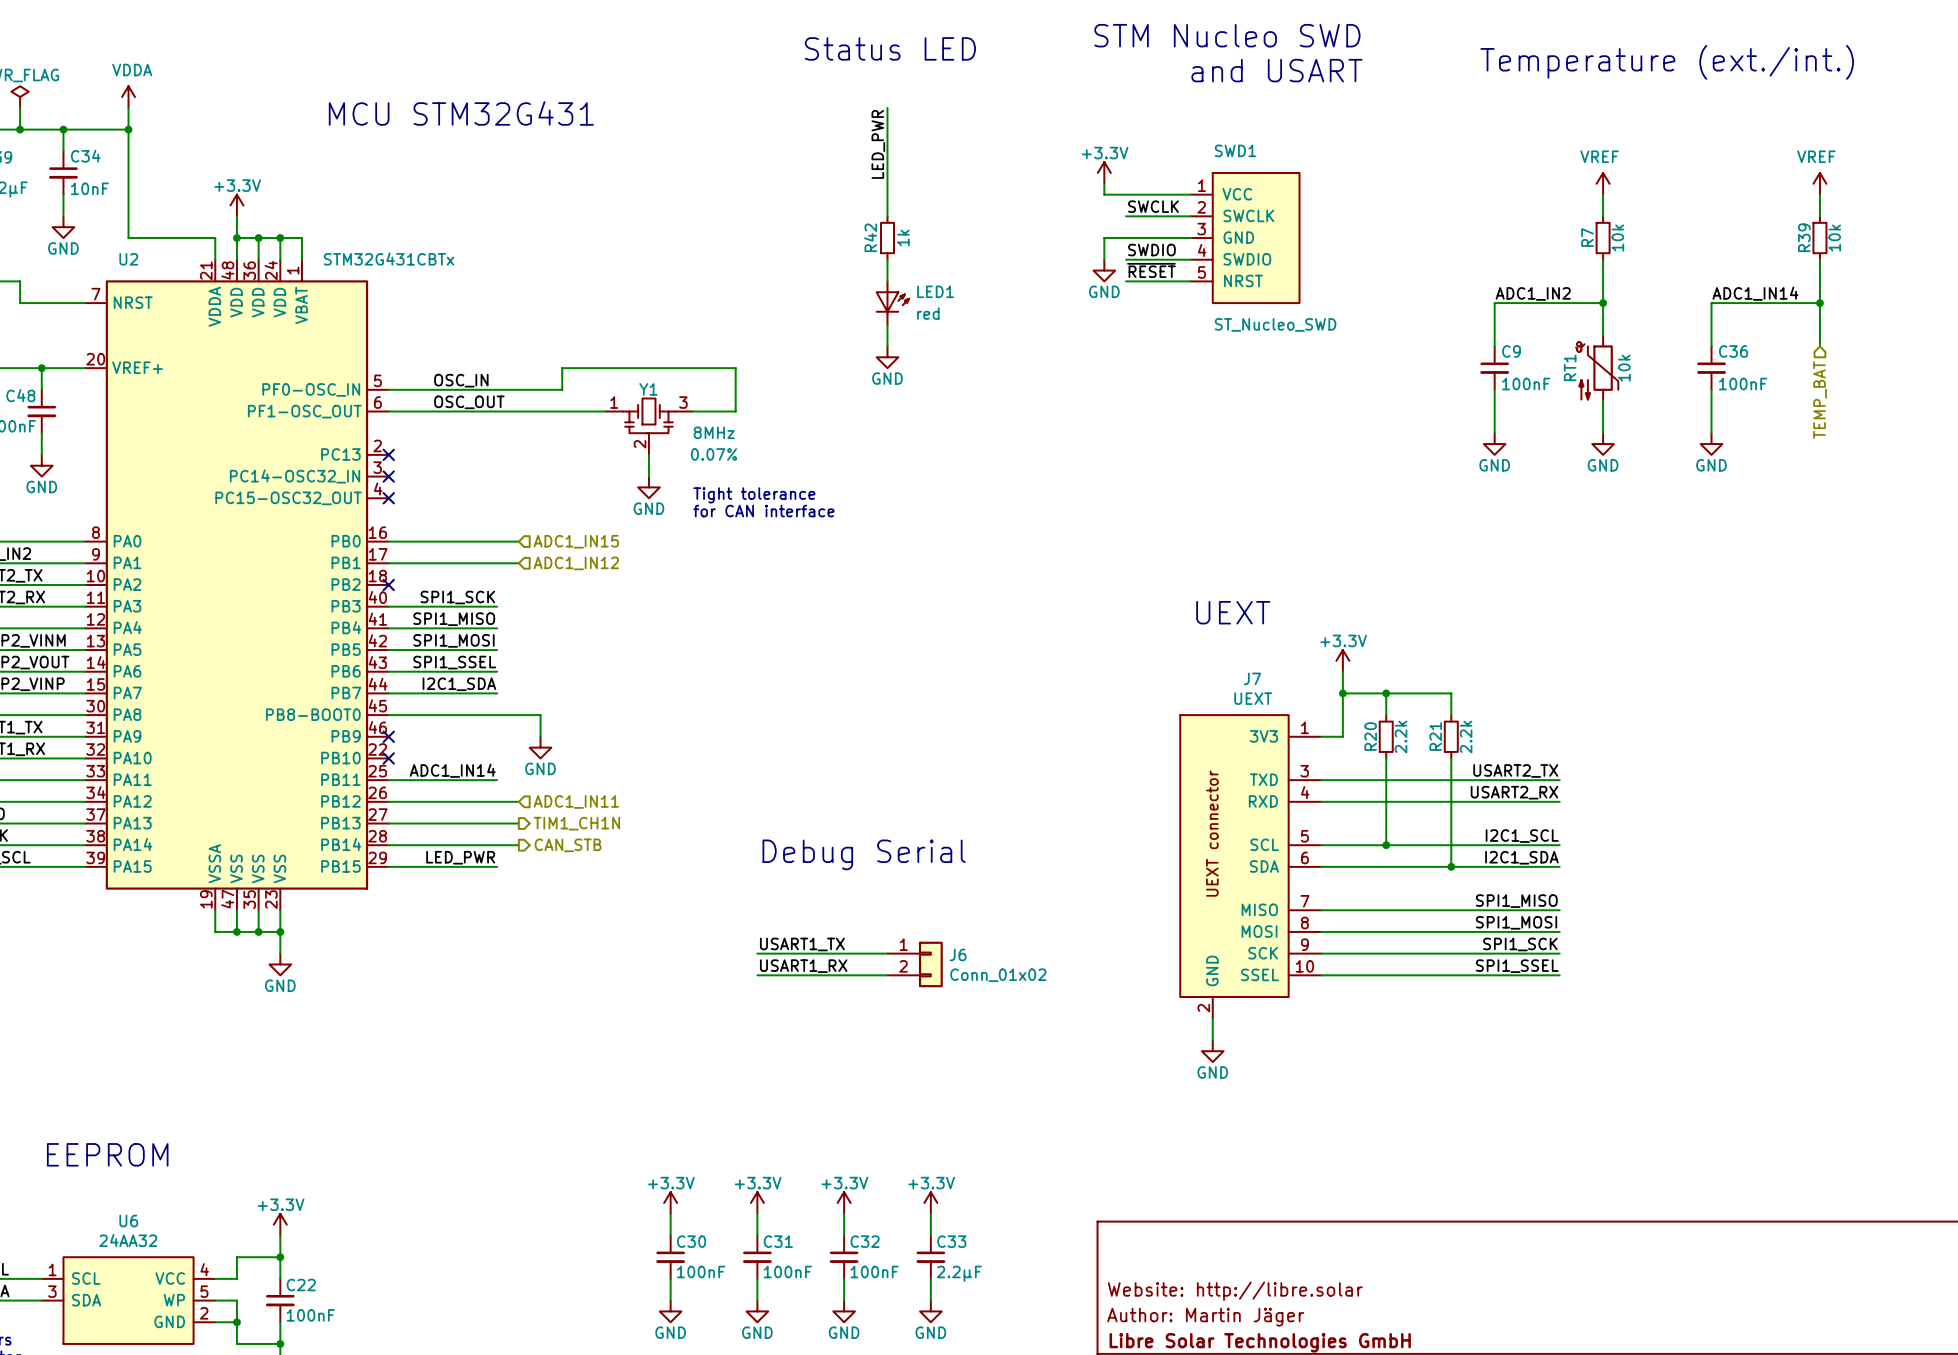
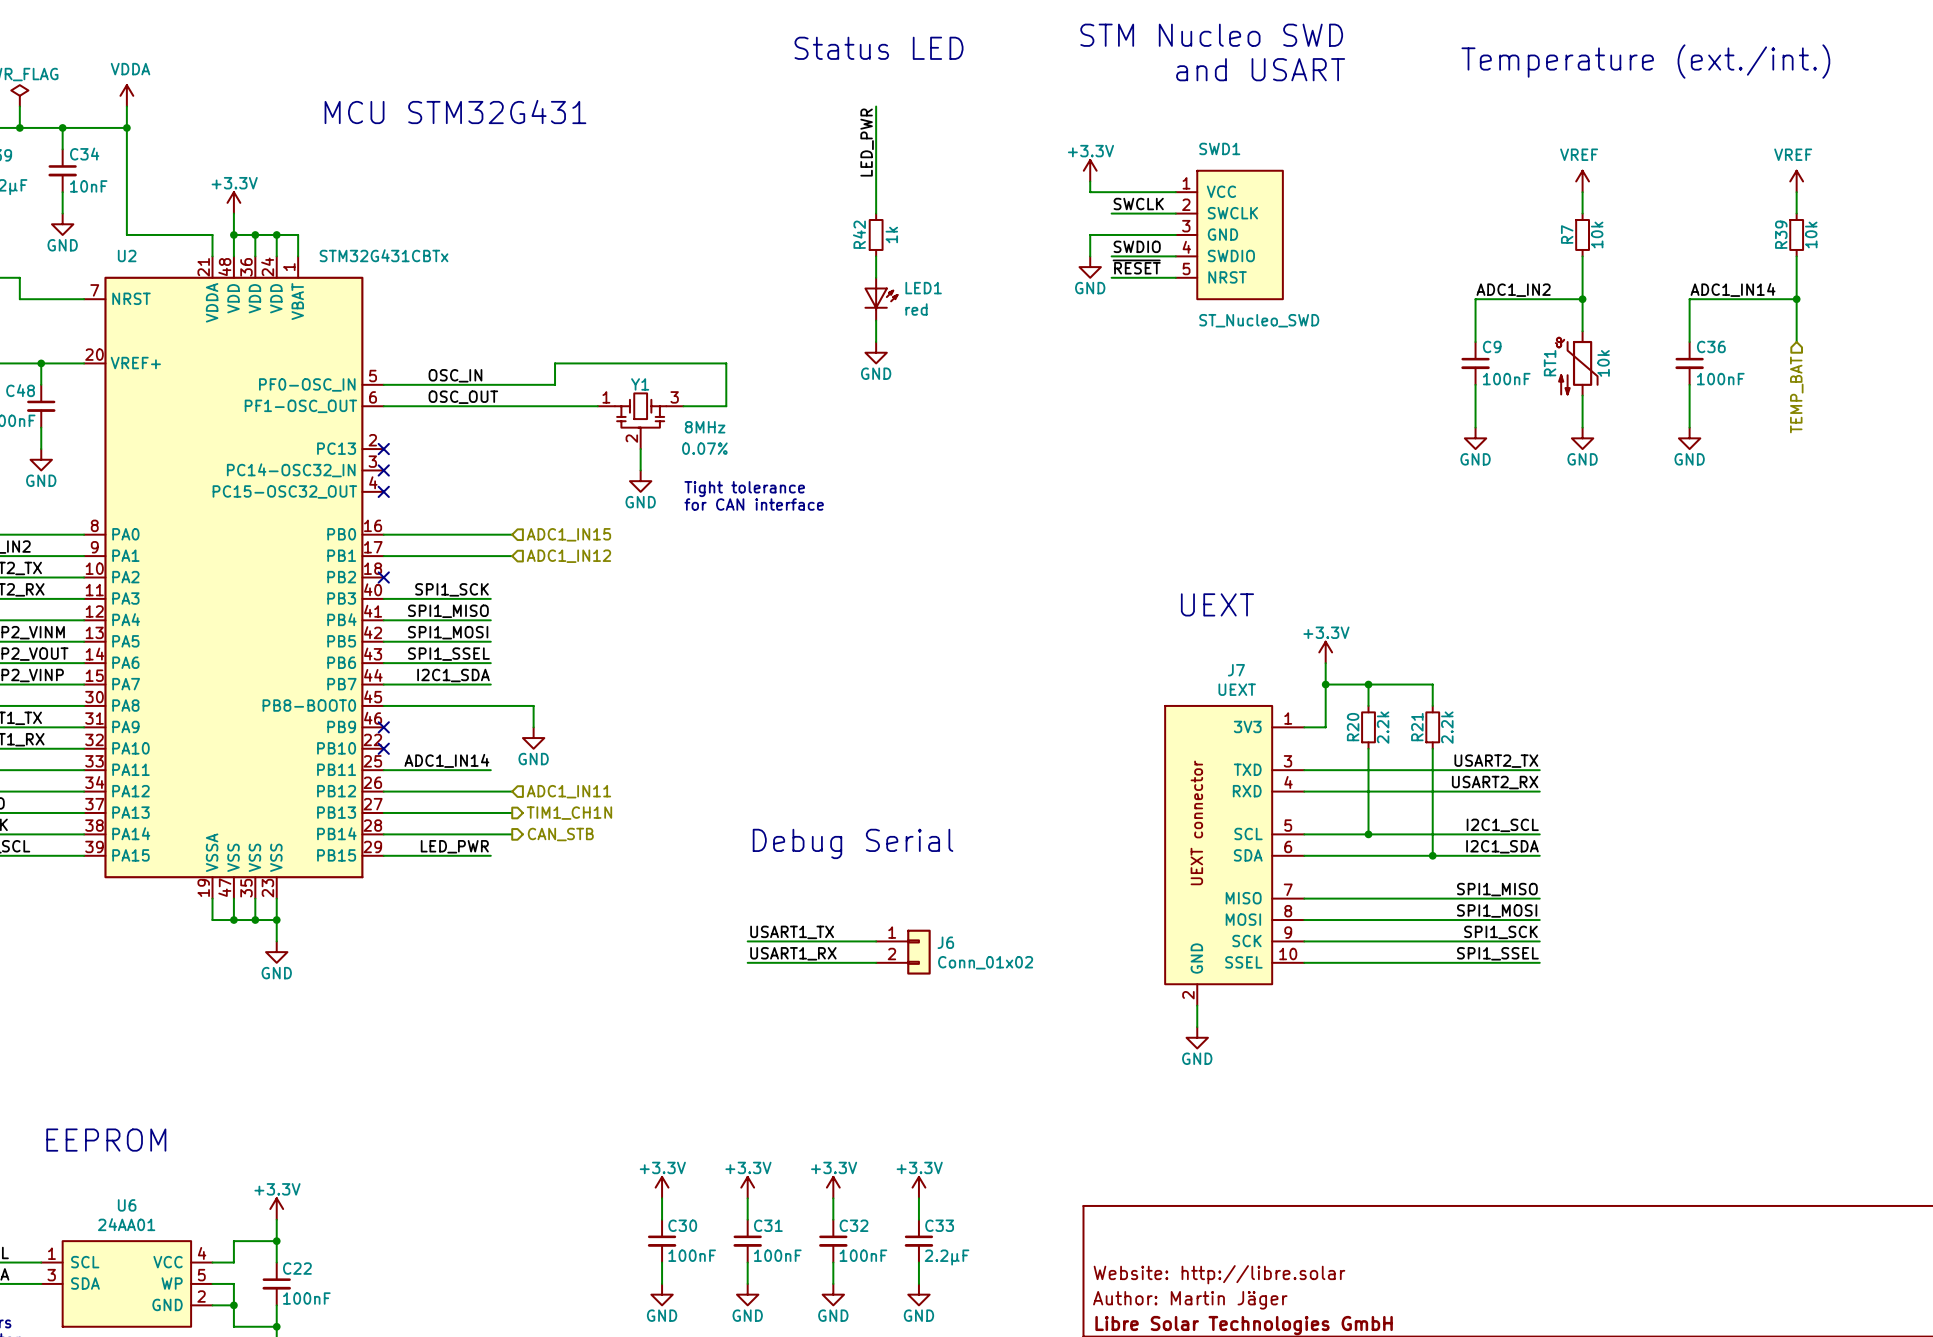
U6 value: 24AA32 (128, 1240) -> 24AA01 (126, 1224)

